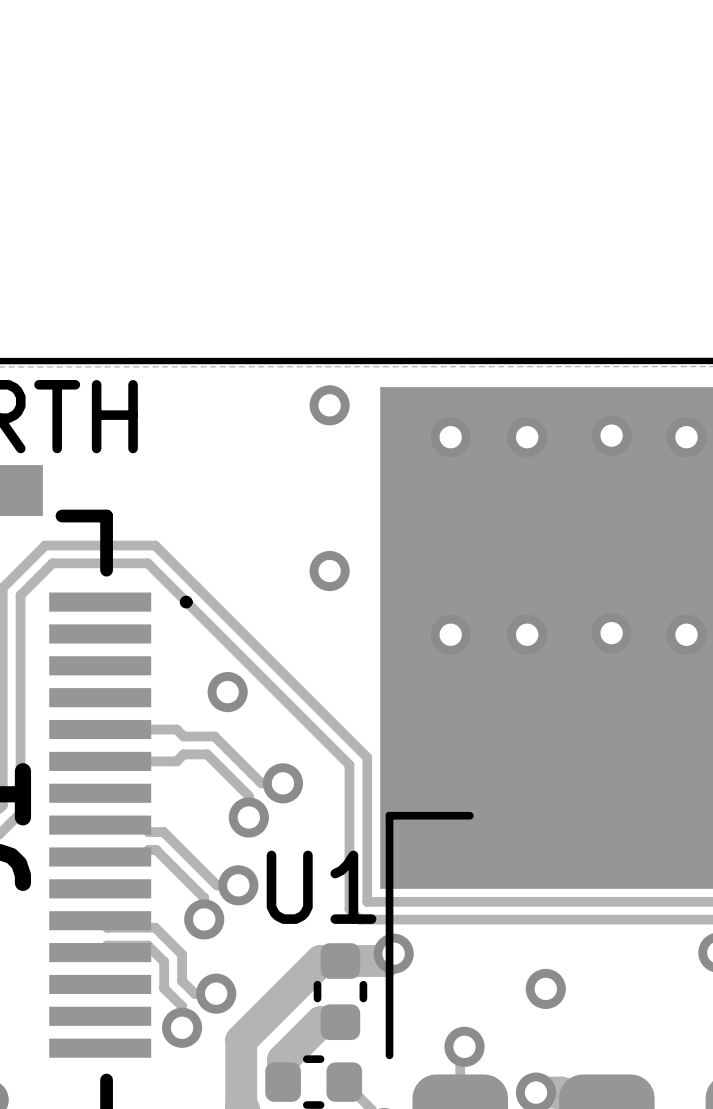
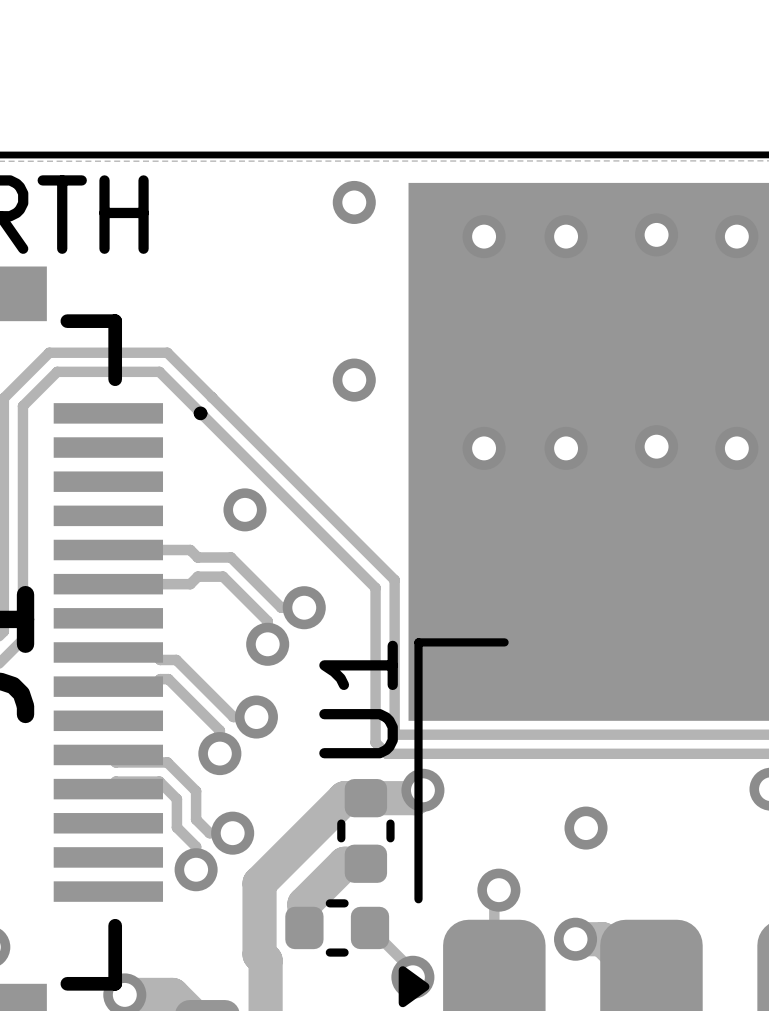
U1 name rotation: 0° (321, 887) -> 90° counterclockwise (358, 699)

